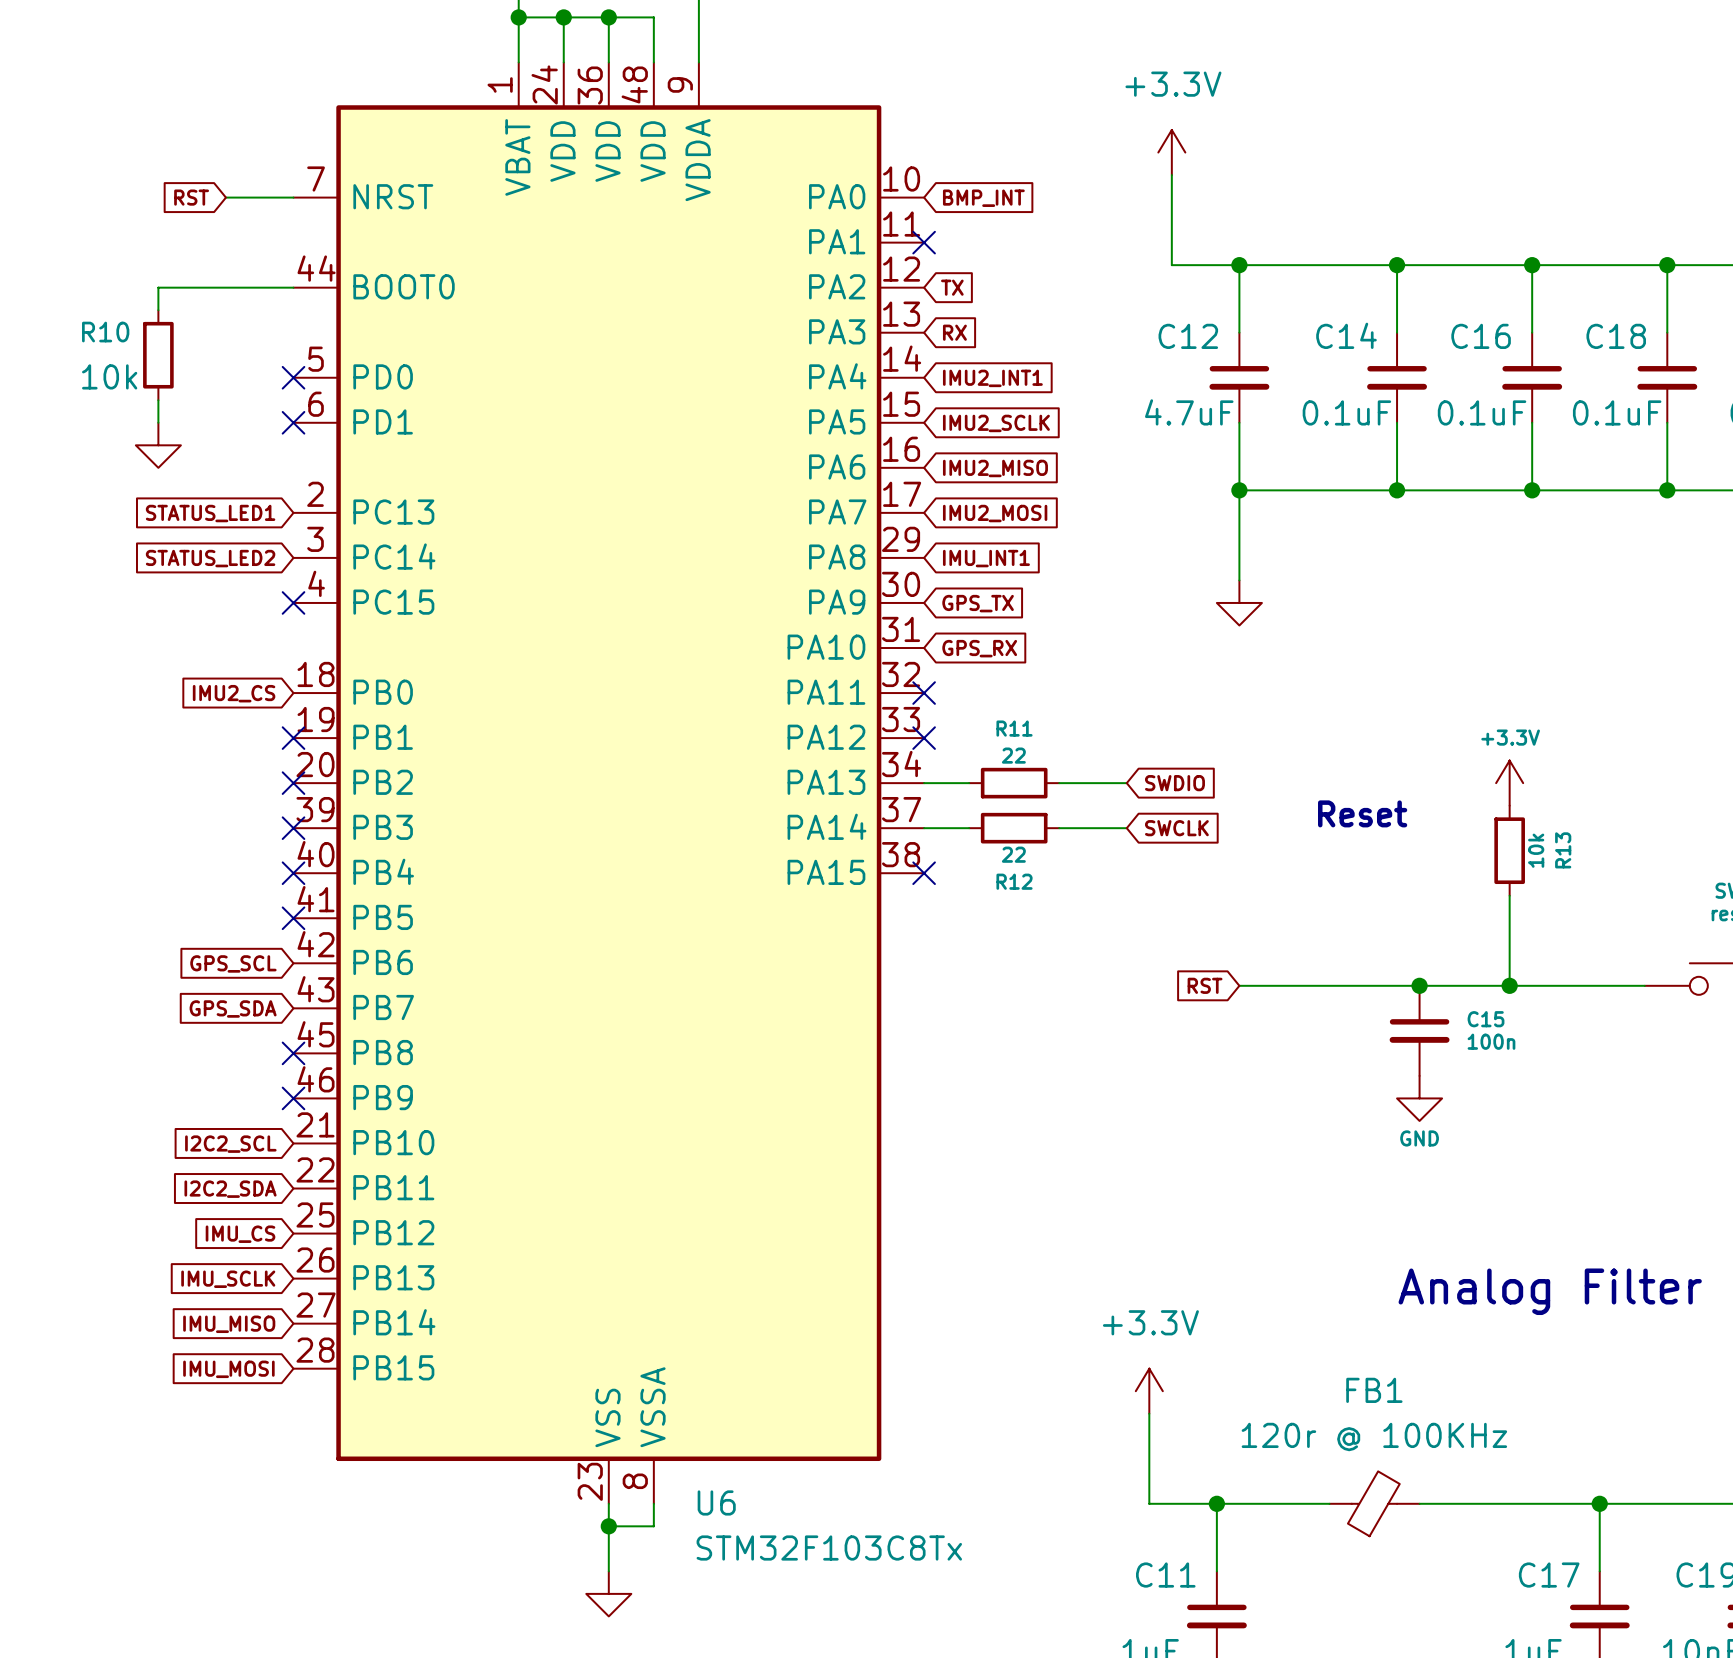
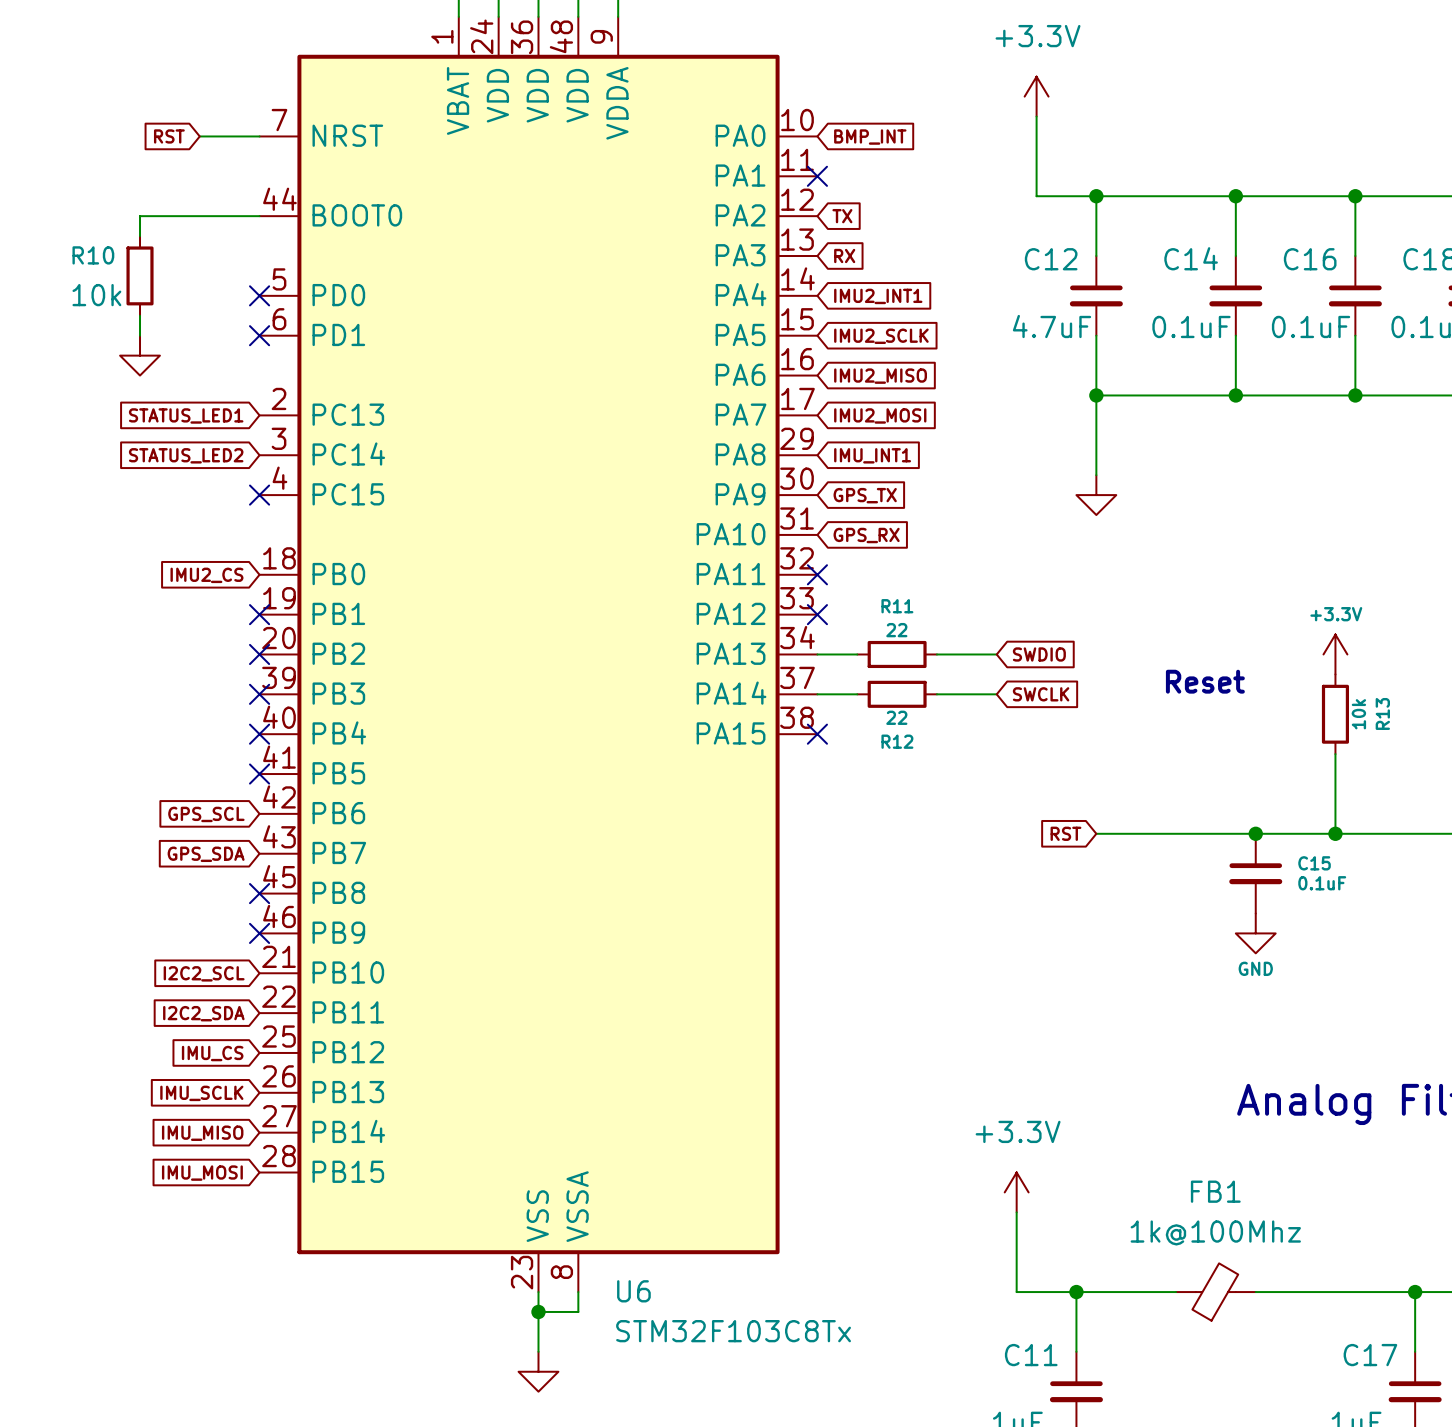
C15 value: 100n (1491, 1041) -> 0.1uF (1322, 883)
FB1 value: 120r @ 100KHz (1374, 1437) -> 1k@100Mhz (1215, 1232)

